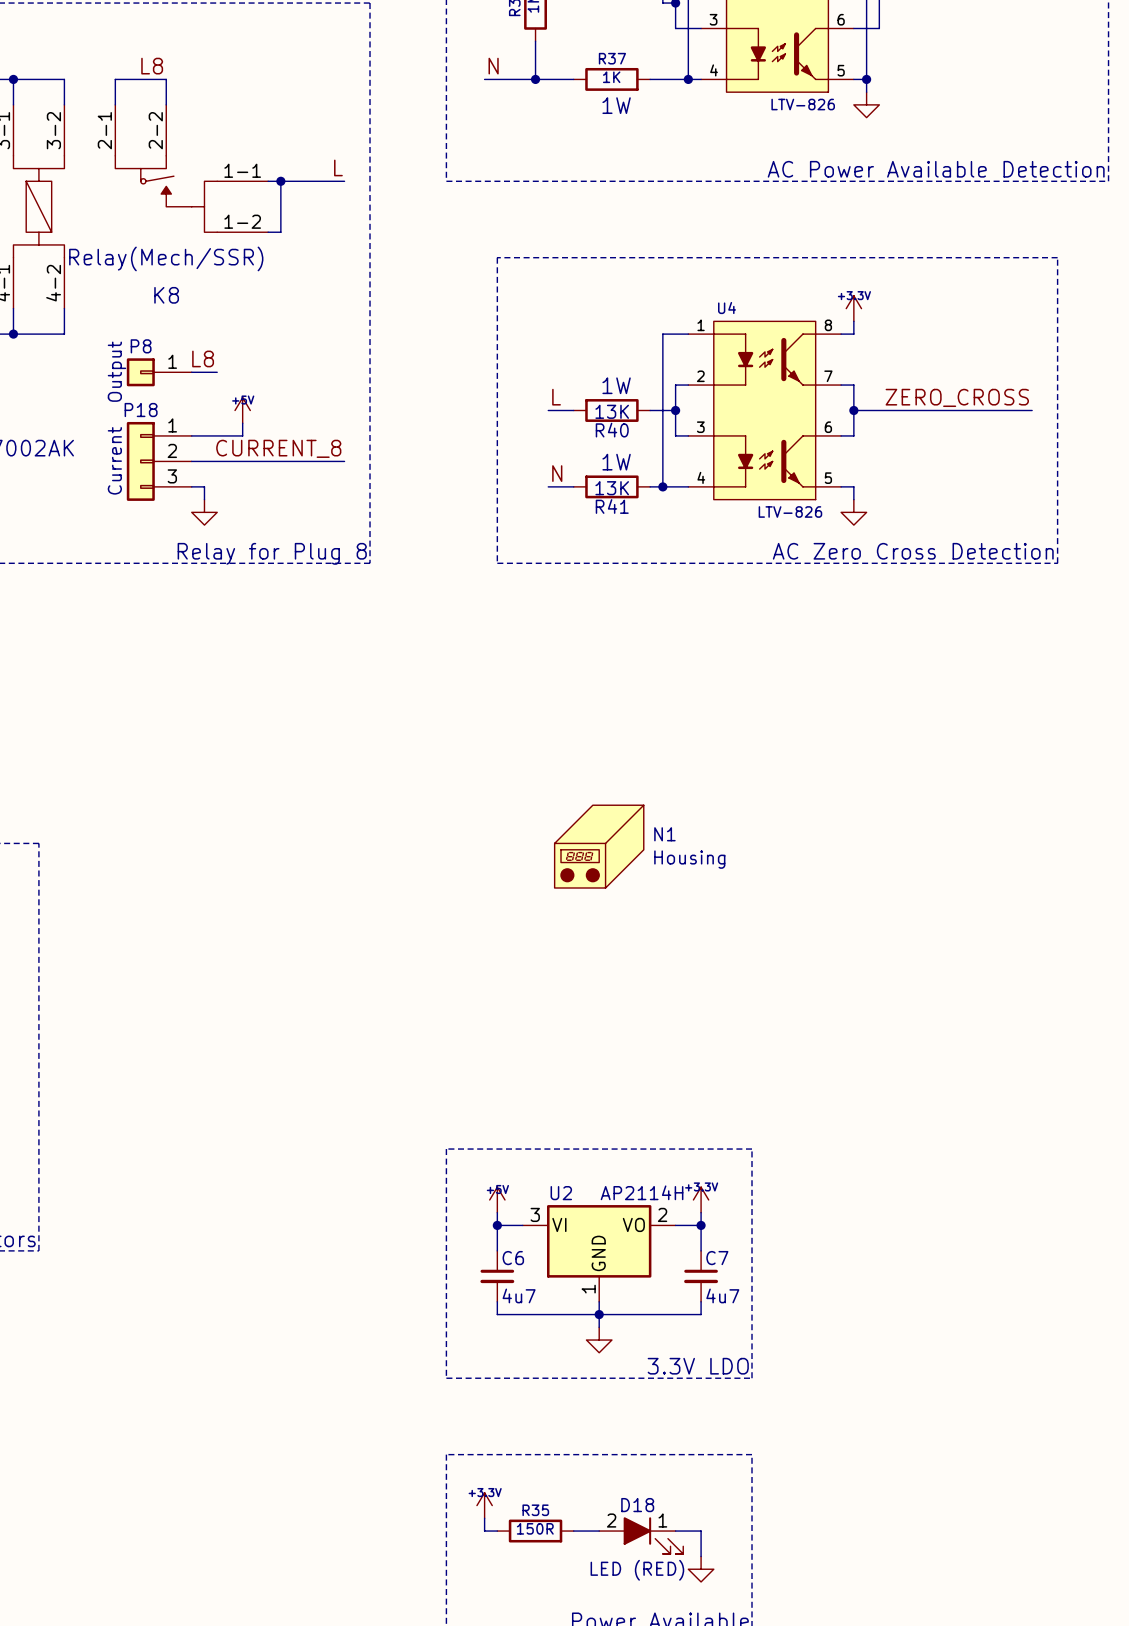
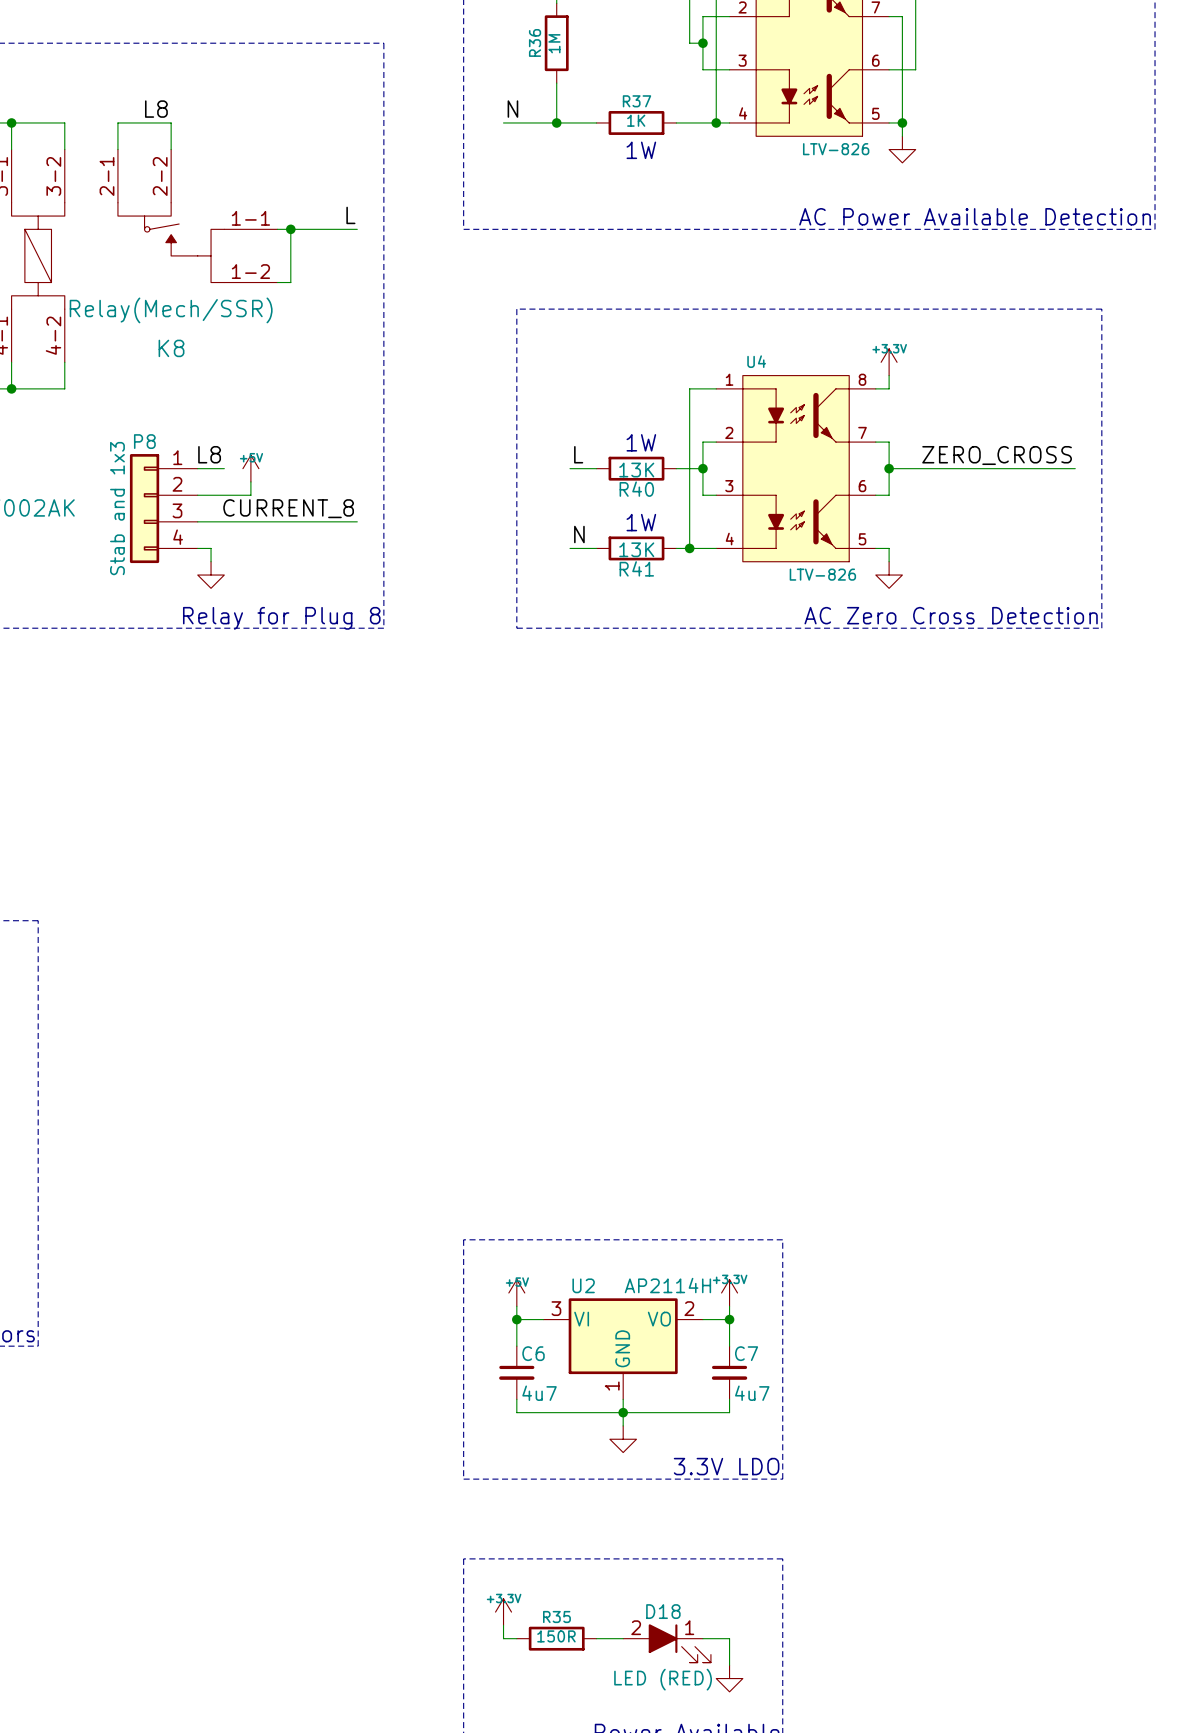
P8 name position: P8 (141, 346) -> P8 (144, 441)
P8 symbol: [126, 358, 192, 387] -> [129, 454, 198, 564]
label position: L8 (203, 358) -> L8 (209, 454)
P8 value: Output (116, 371) -> Stab and 1x3 (117, 508)
wire: (191, 372) (217, 372) -> (197, 468) (224, 468)
P18: Current (159, 461) -> none
N1: Housing (599, 846) -> none

